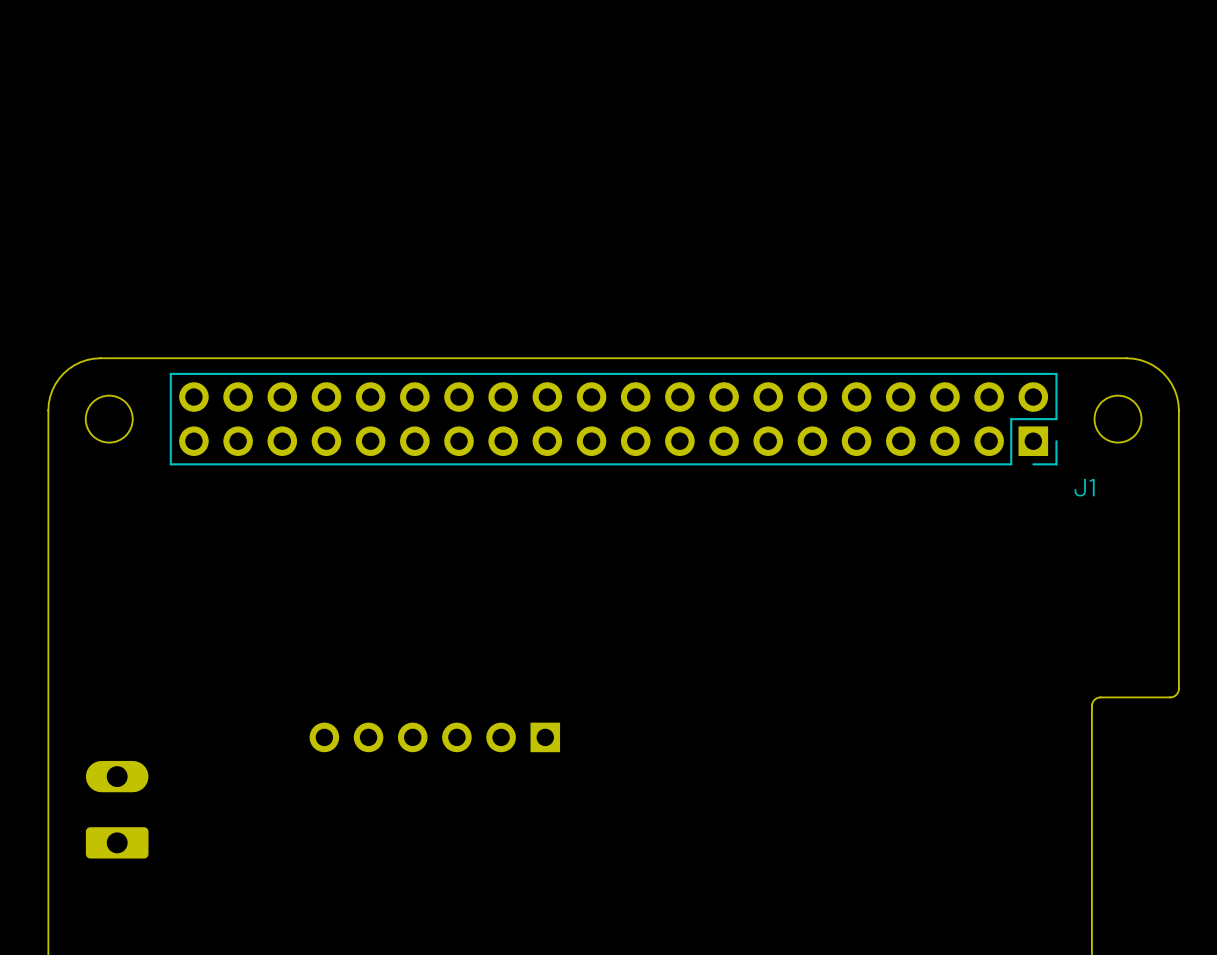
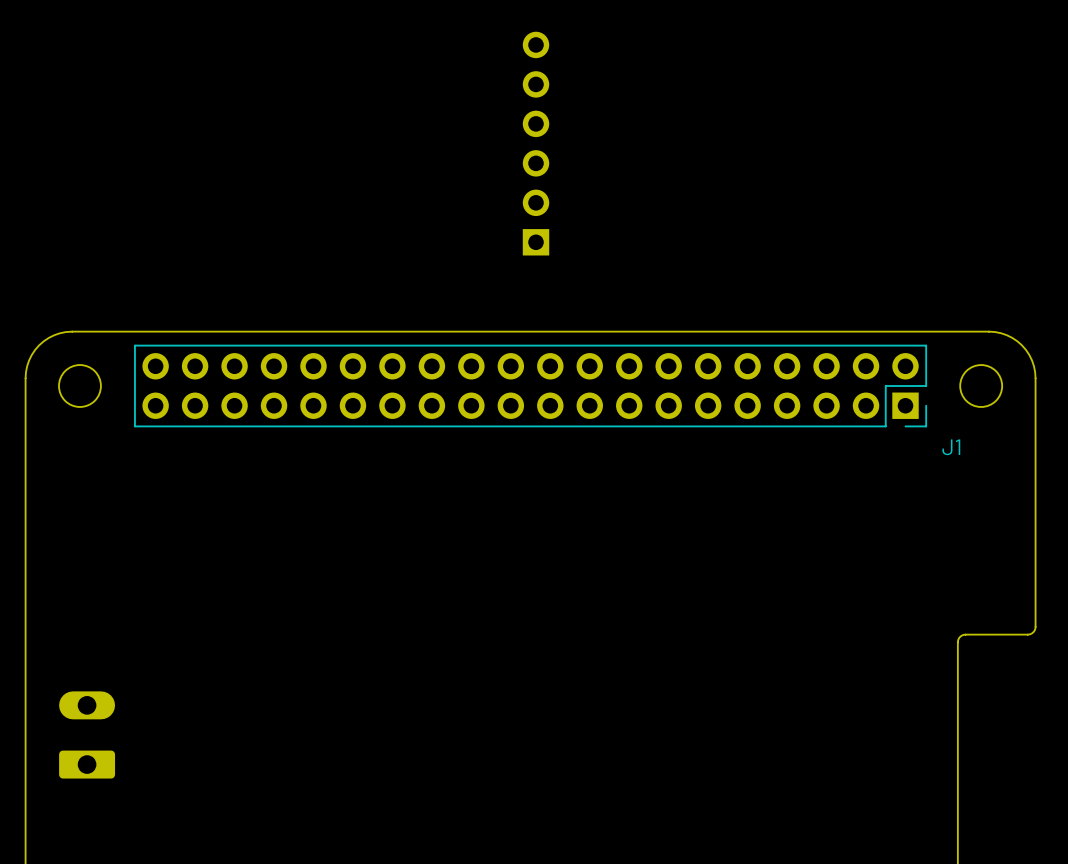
part: none -> (536, 143)
part: (434, 737) -> none

